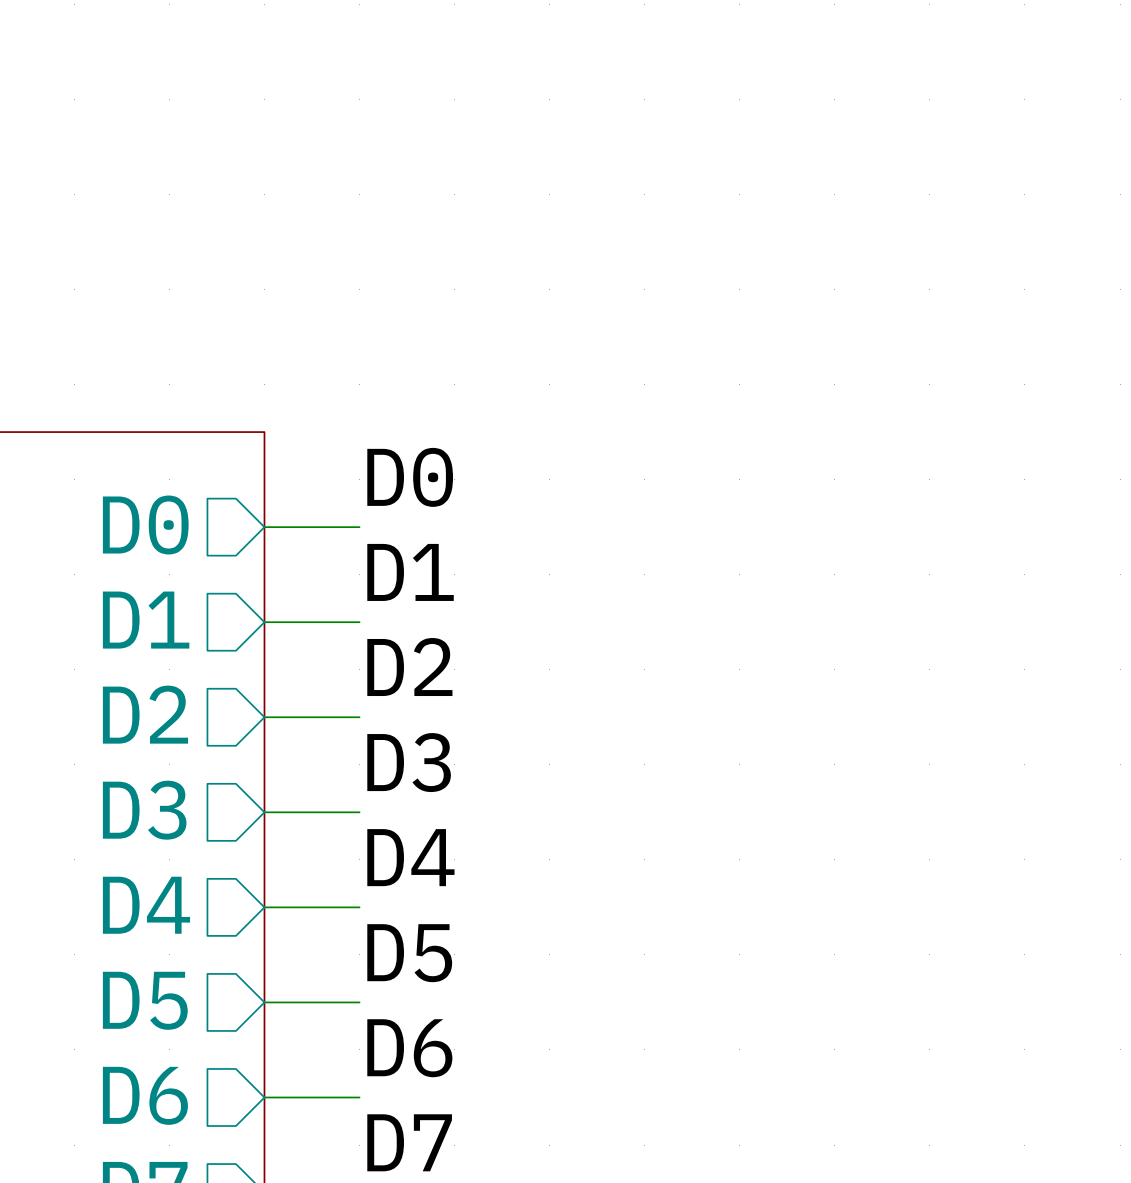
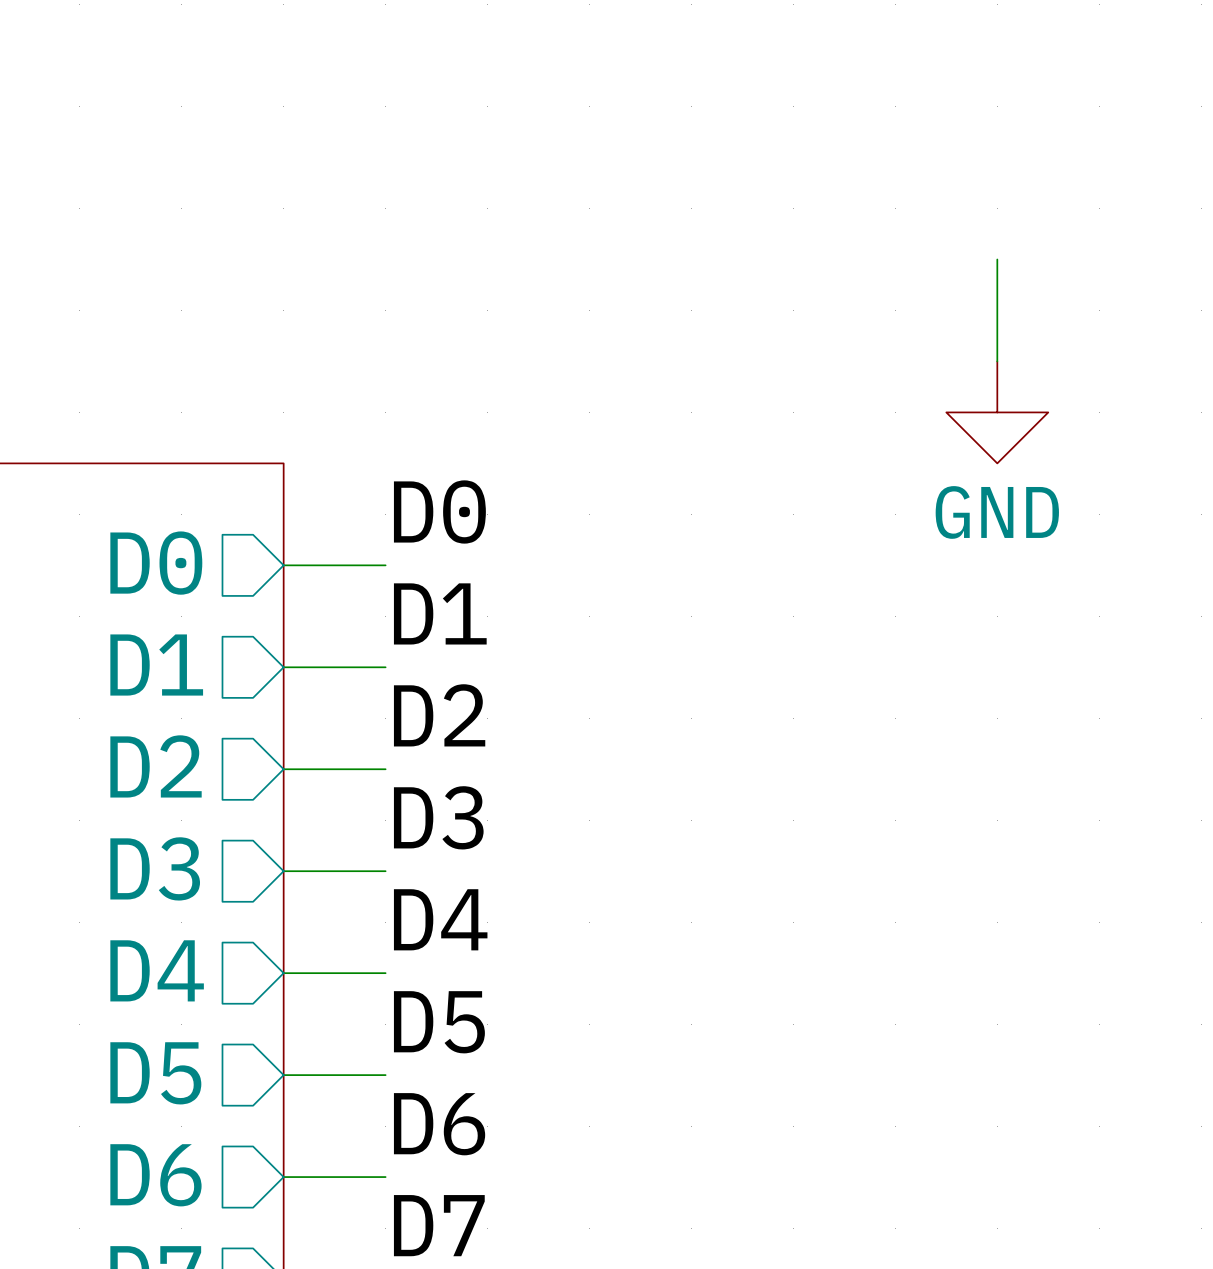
wire: none -> (997, 259) (997, 361)
power symbol: none -> GND (997, 412)

